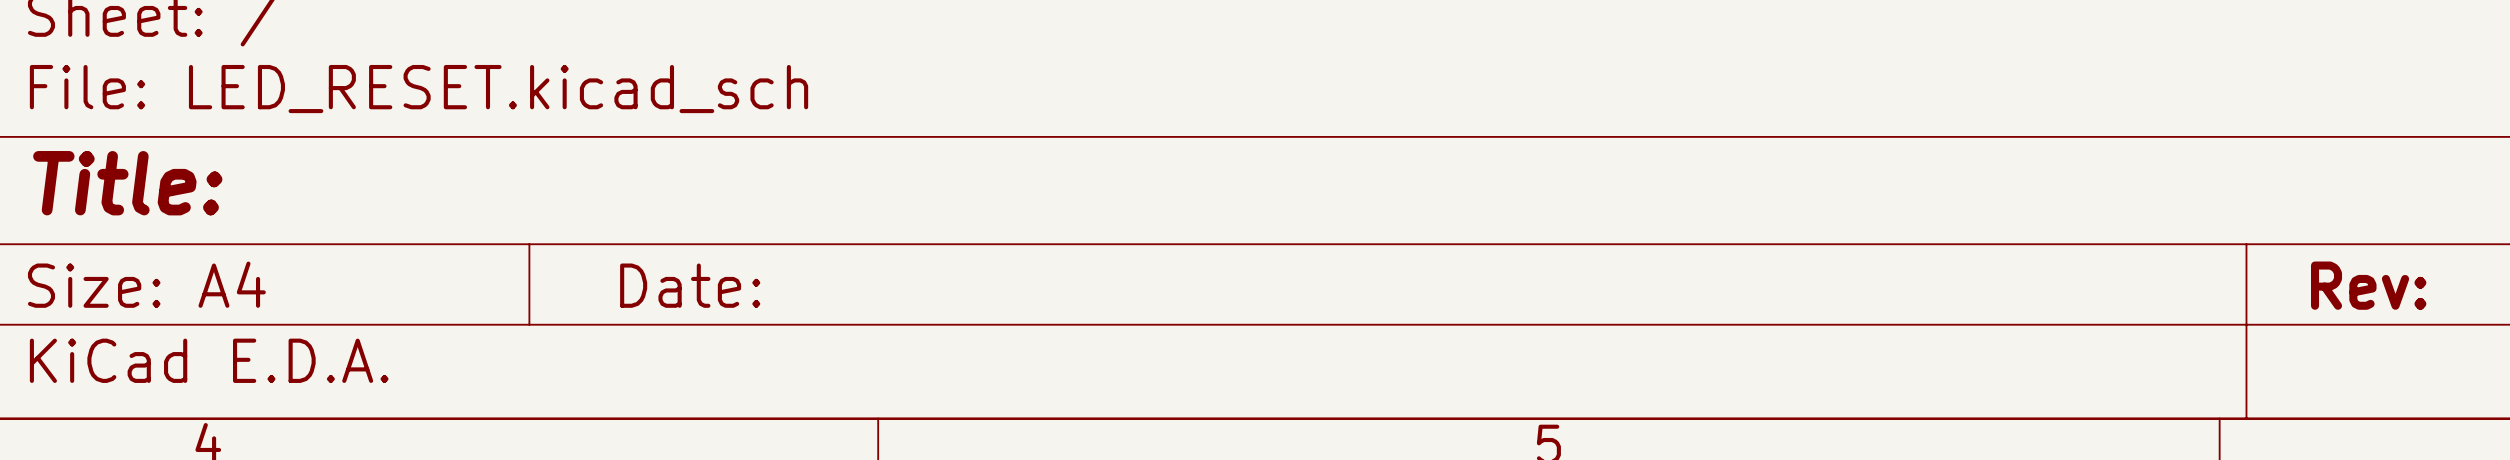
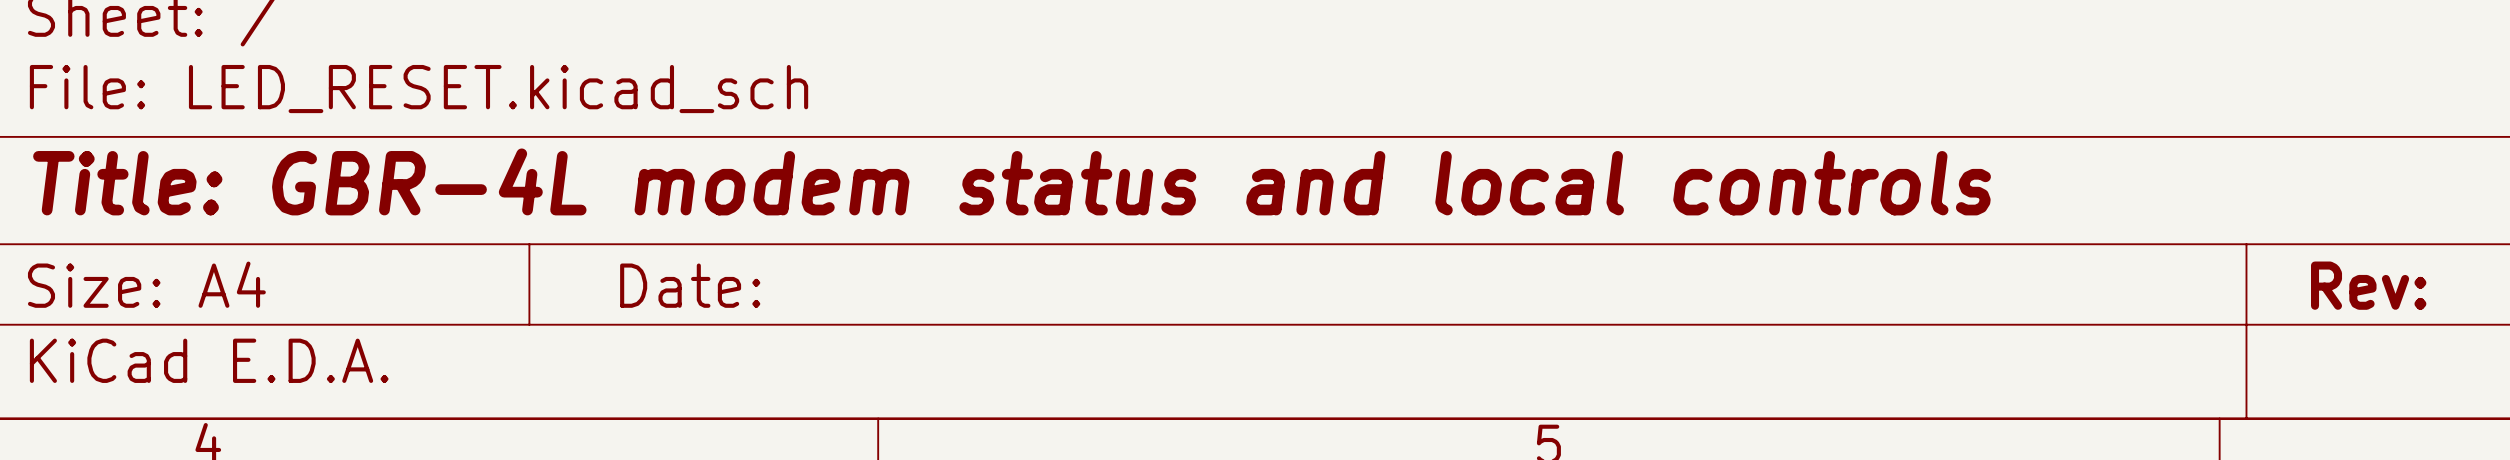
title block: Title: (127, 183) -> Title: GBR-4L modem status and local controls (1012, 181)

